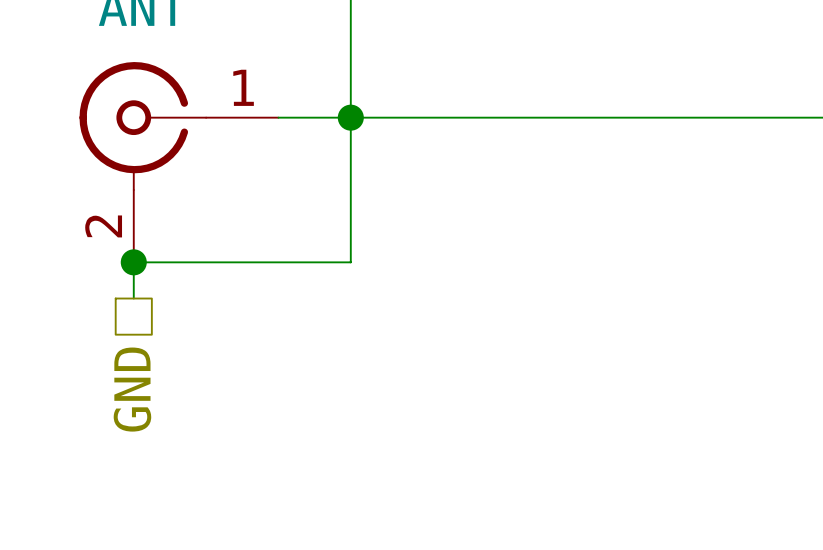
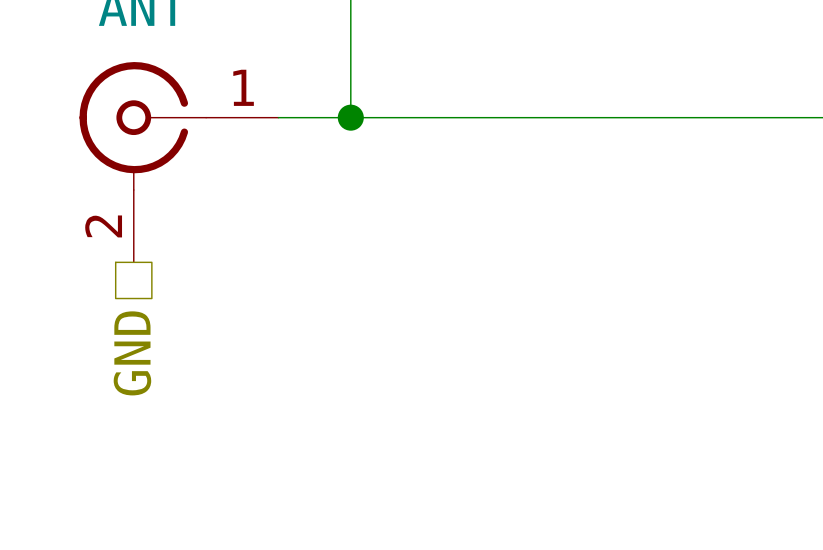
wire: (350, 117) (350, 262) (133, 262) (133, 298) -> none
junction: (133, 262) -> none
hierarchical label position: GND (132, 389) -> GND (132, 353)

